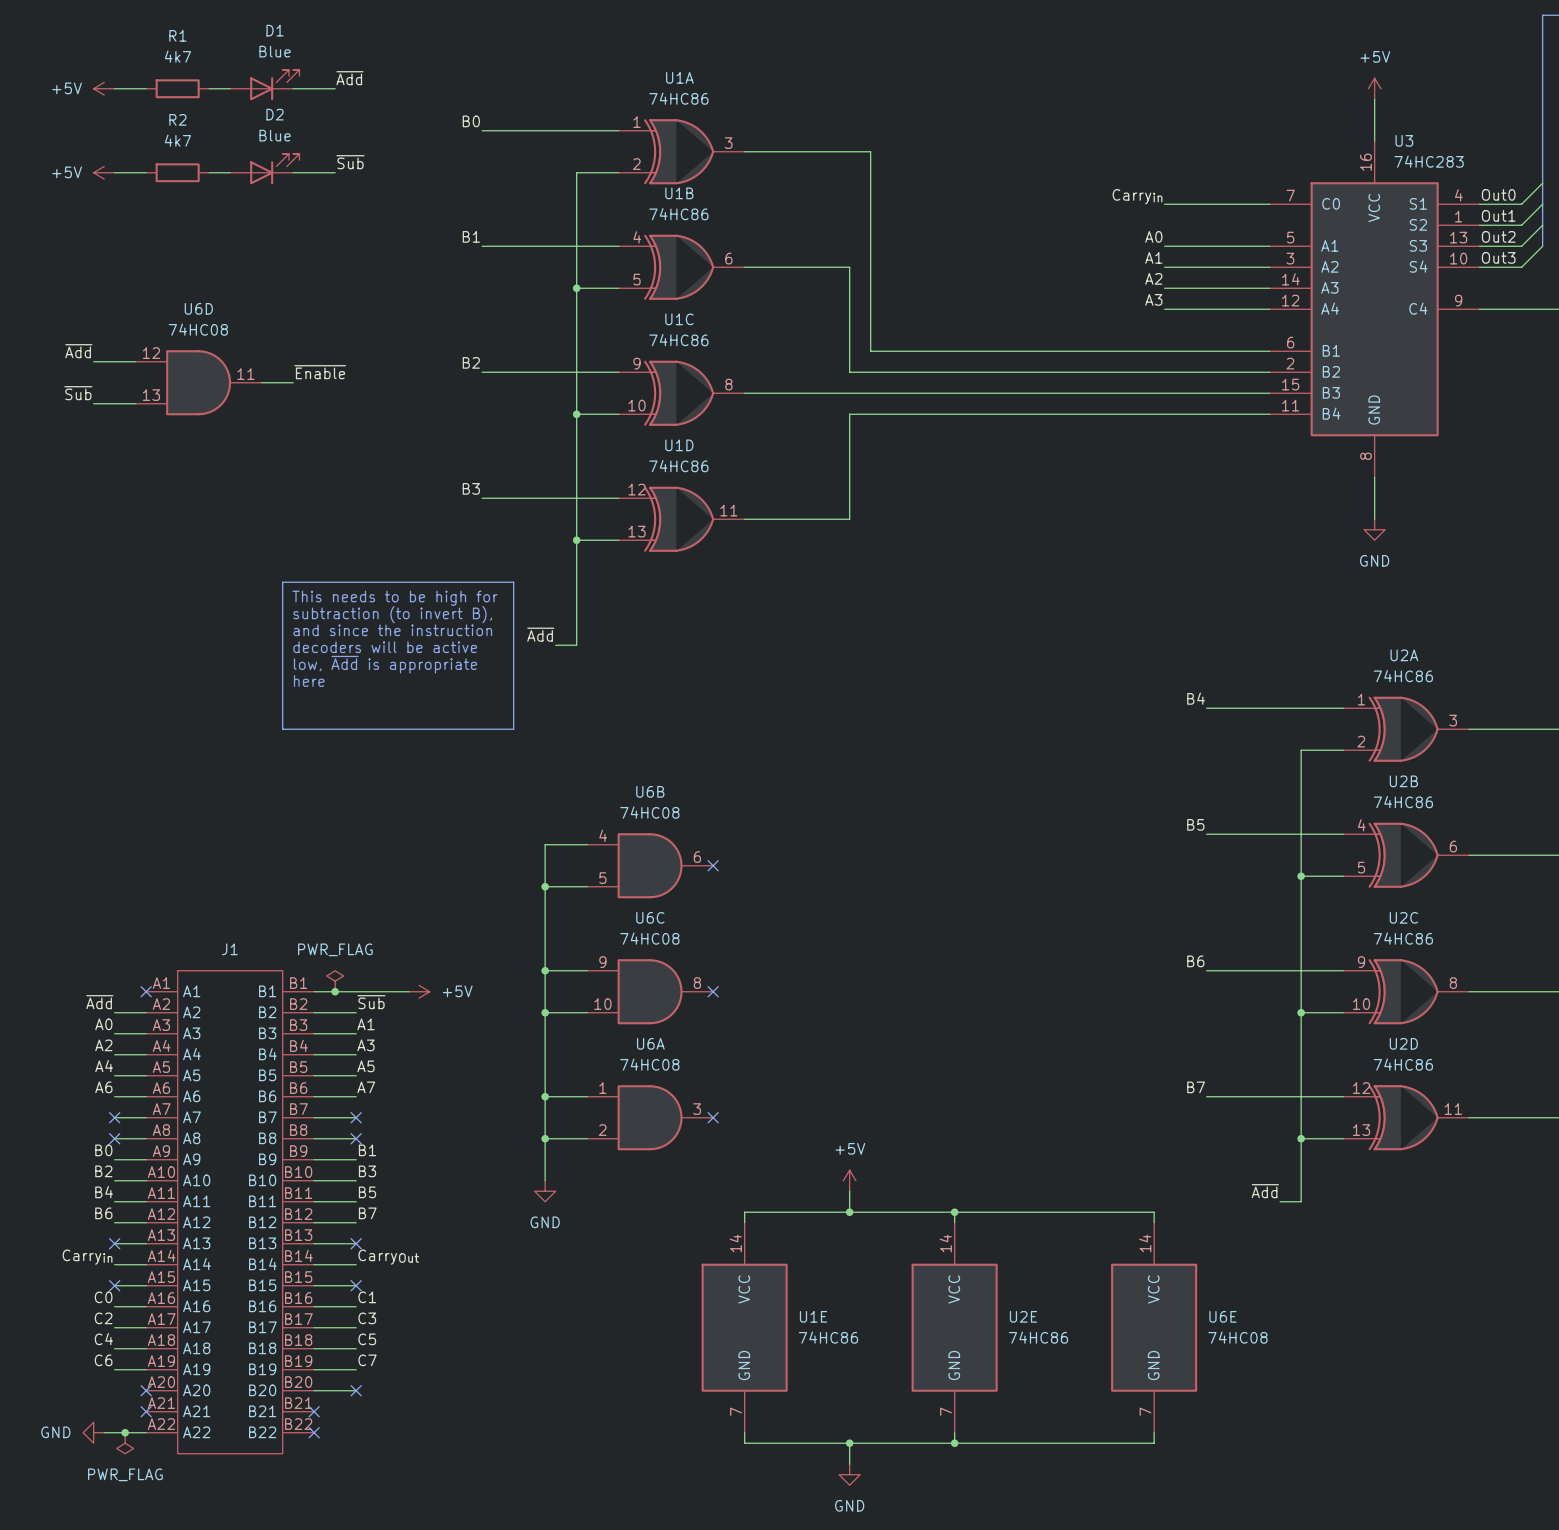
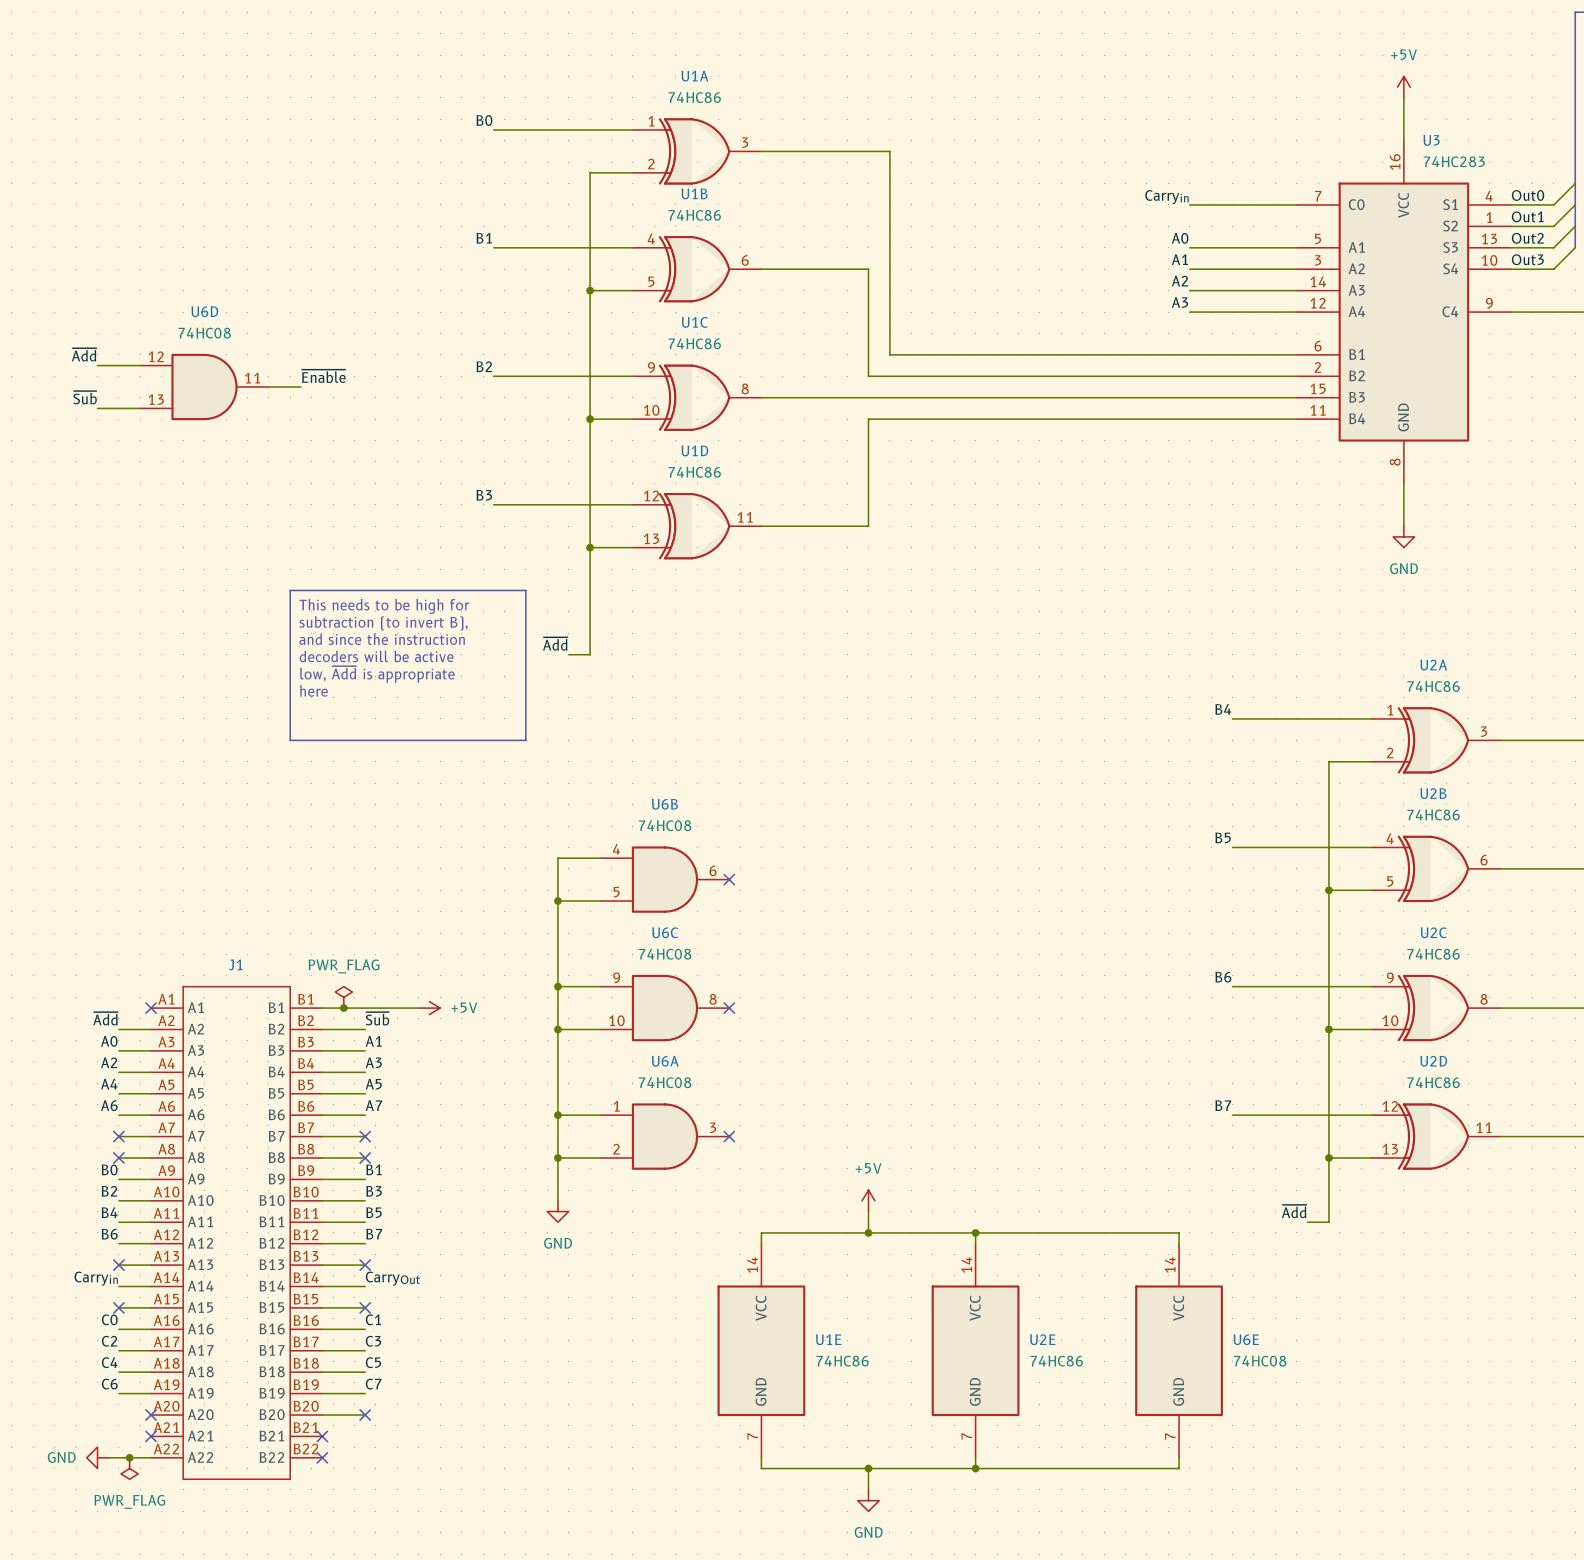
label: ~{Add} (349, 78) -> none
D1: Blue (264, 85) -> none
power symbol: +5V (104, 88) -> none
wire: (114, 88) (146, 88) -> none
R1: 4k7 (177, 88) -> none
wire: (209, 88) (230, 88) -> none
wire: (293, 88) (335, 88) -> none
label: ~{Sub} (350, 162) -> none
D2: Blue (264, 169) -> none
power symbol: +5V (104, 172) -> none
wire: (114, 172) (146, 172) -> none
R2: 4k7 (177, 172) -> none
wire: (209, 172) (230, 172) -> none
wire: (293, 172) (335, 172) -> none

